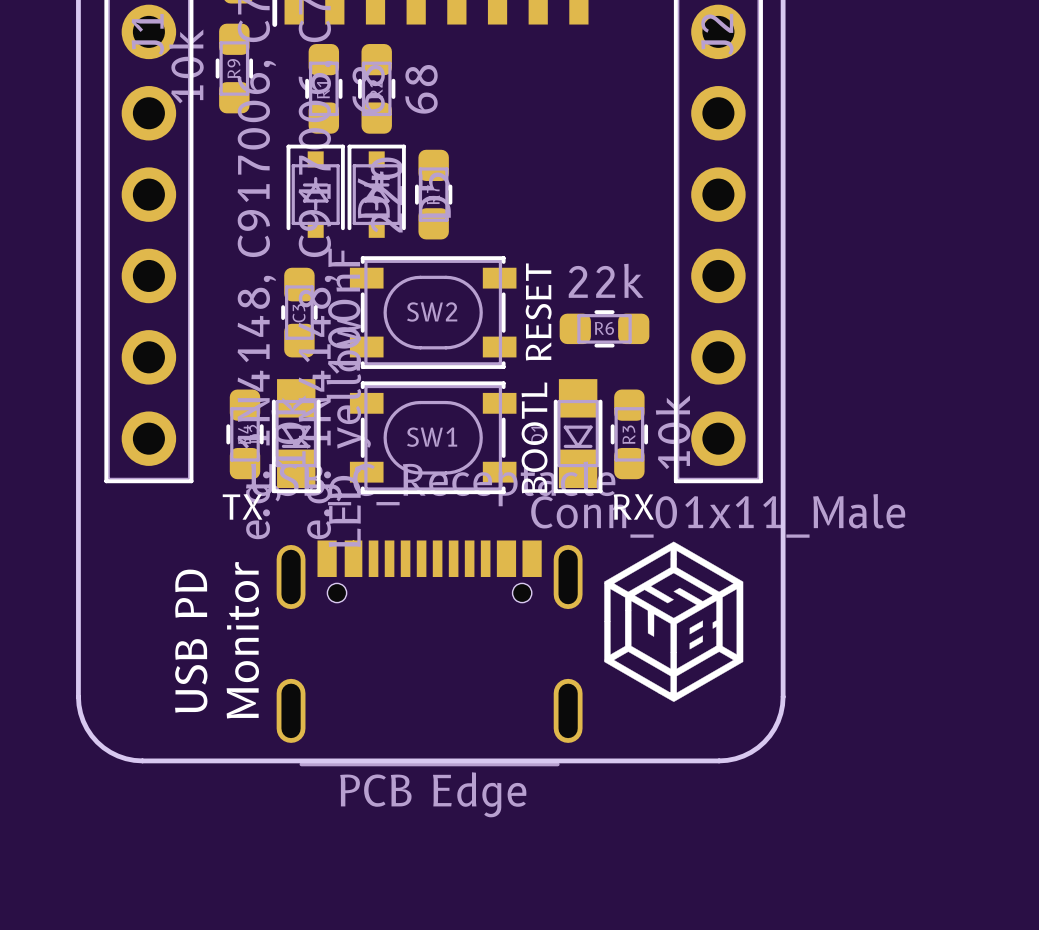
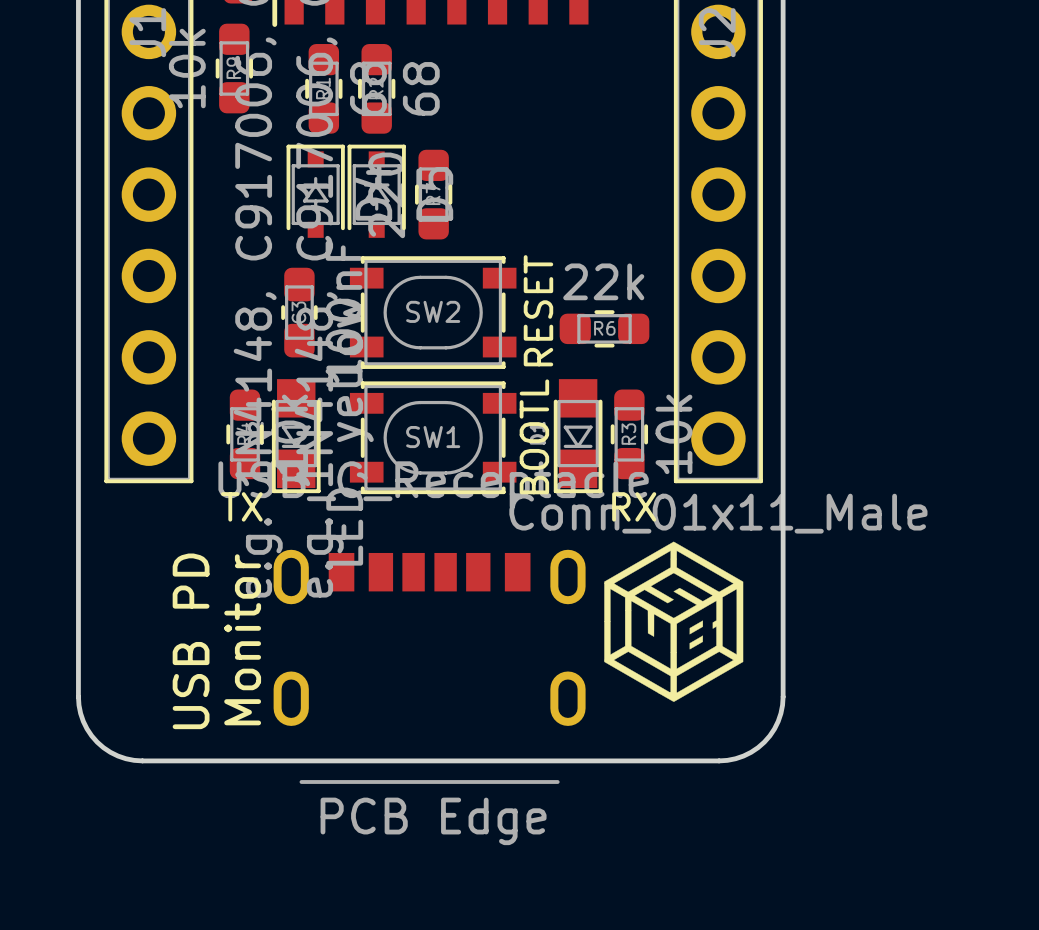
part footprint: [276, 540, 583, 767] -> [273, 549, 586, 784]

